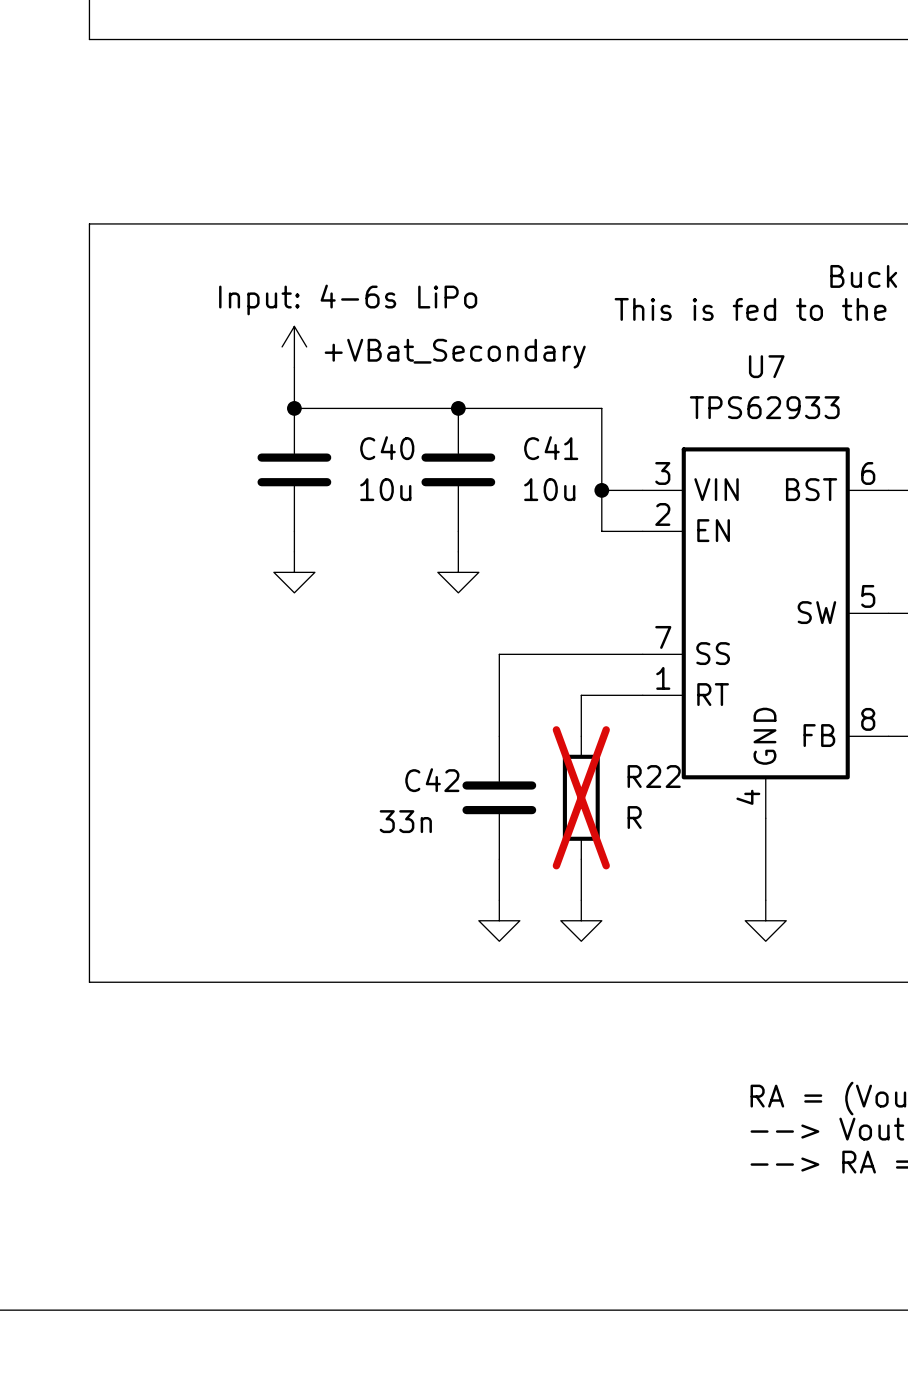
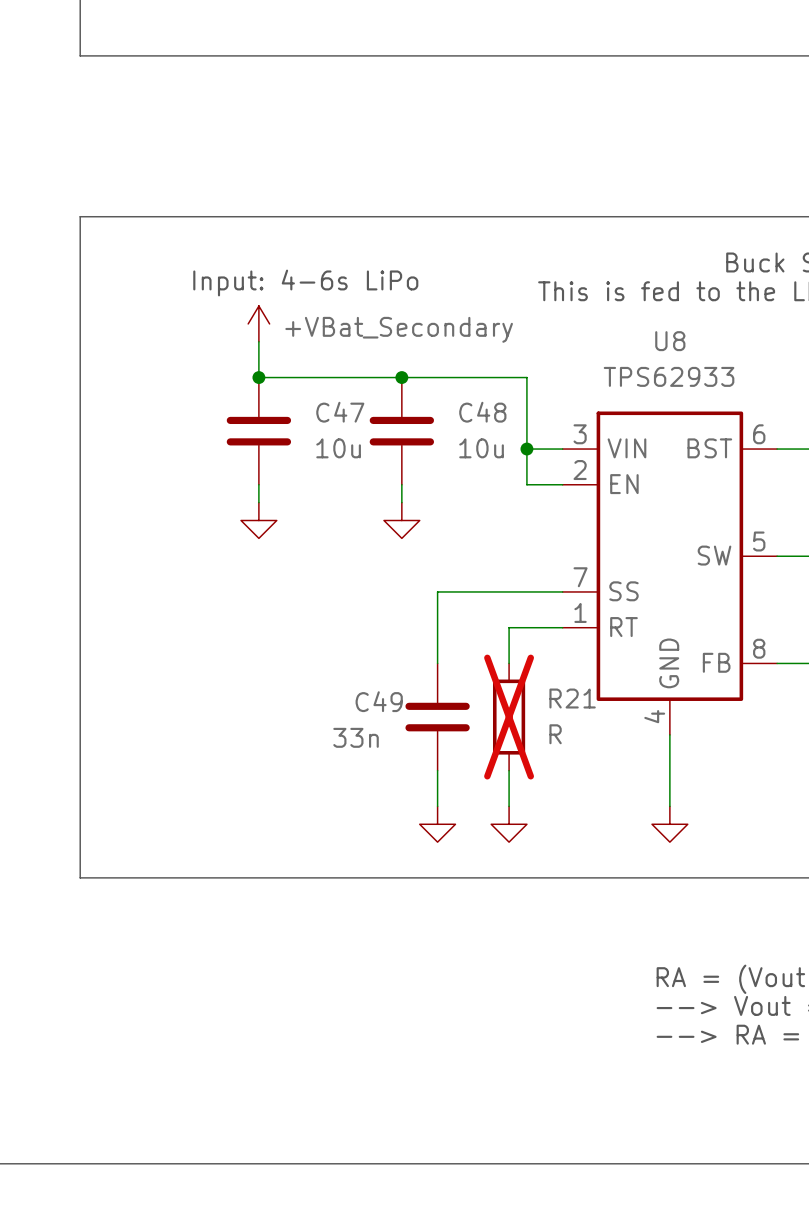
U7 name: U7 (766, 366) -> U8 (670, 341)
C40 name: C40 (387, 448) -> C47 (340, 412)
C41 name: C41 (551, 448) -> C48 (482, 412)
R22 name: R22 (654, 776) -> R21 (572, 698)
C42 name: C42 (432, 780) -> C49 (379, 701)

